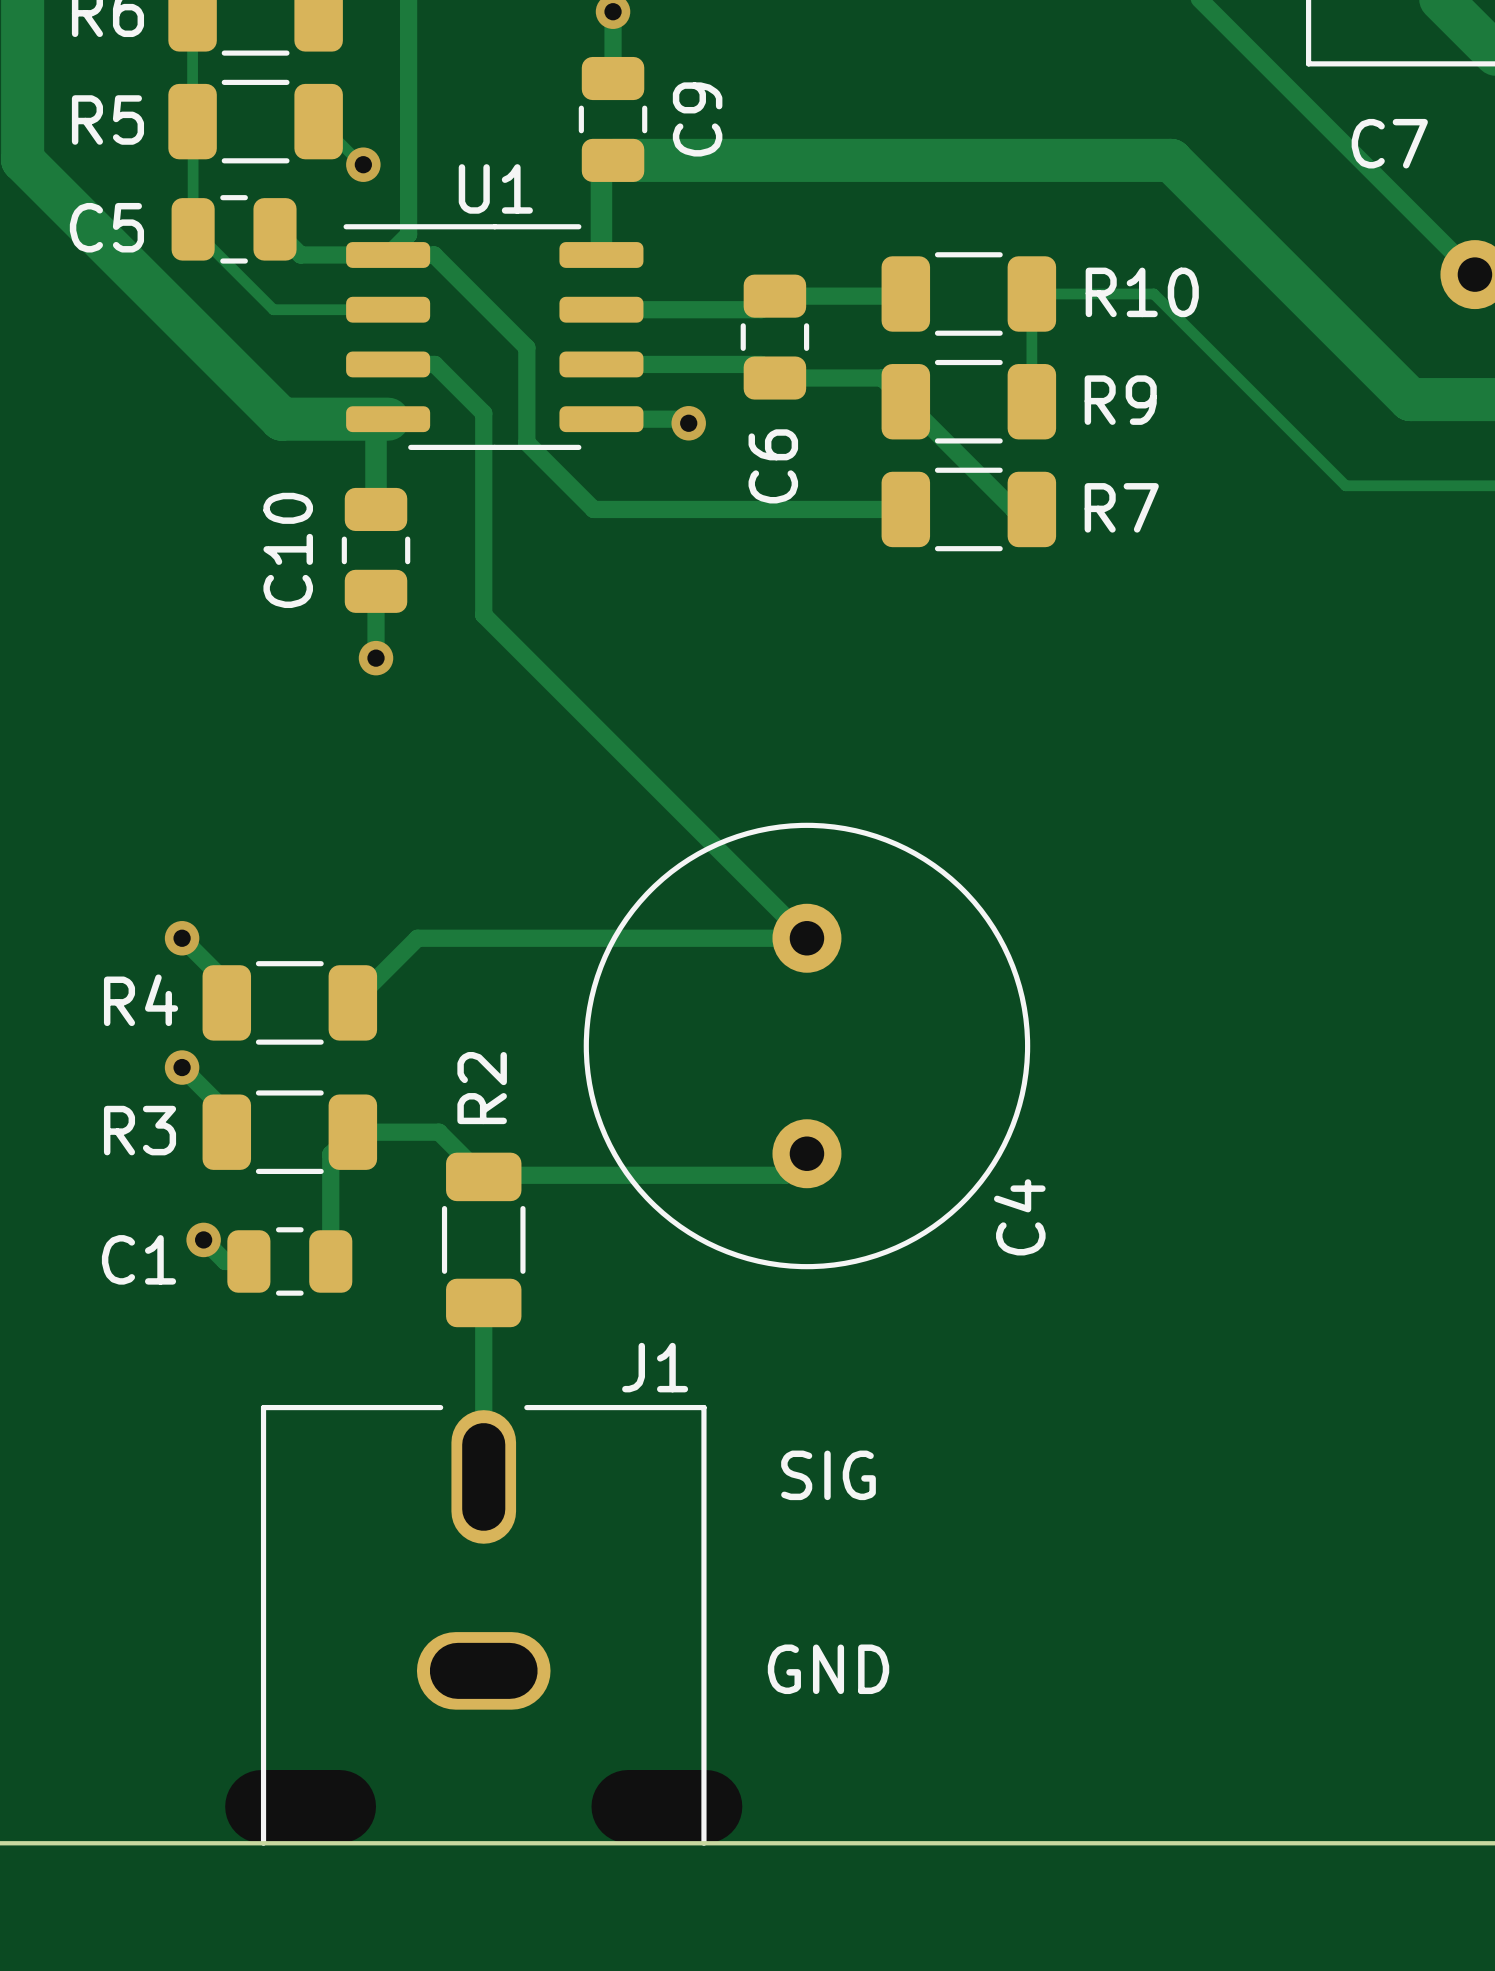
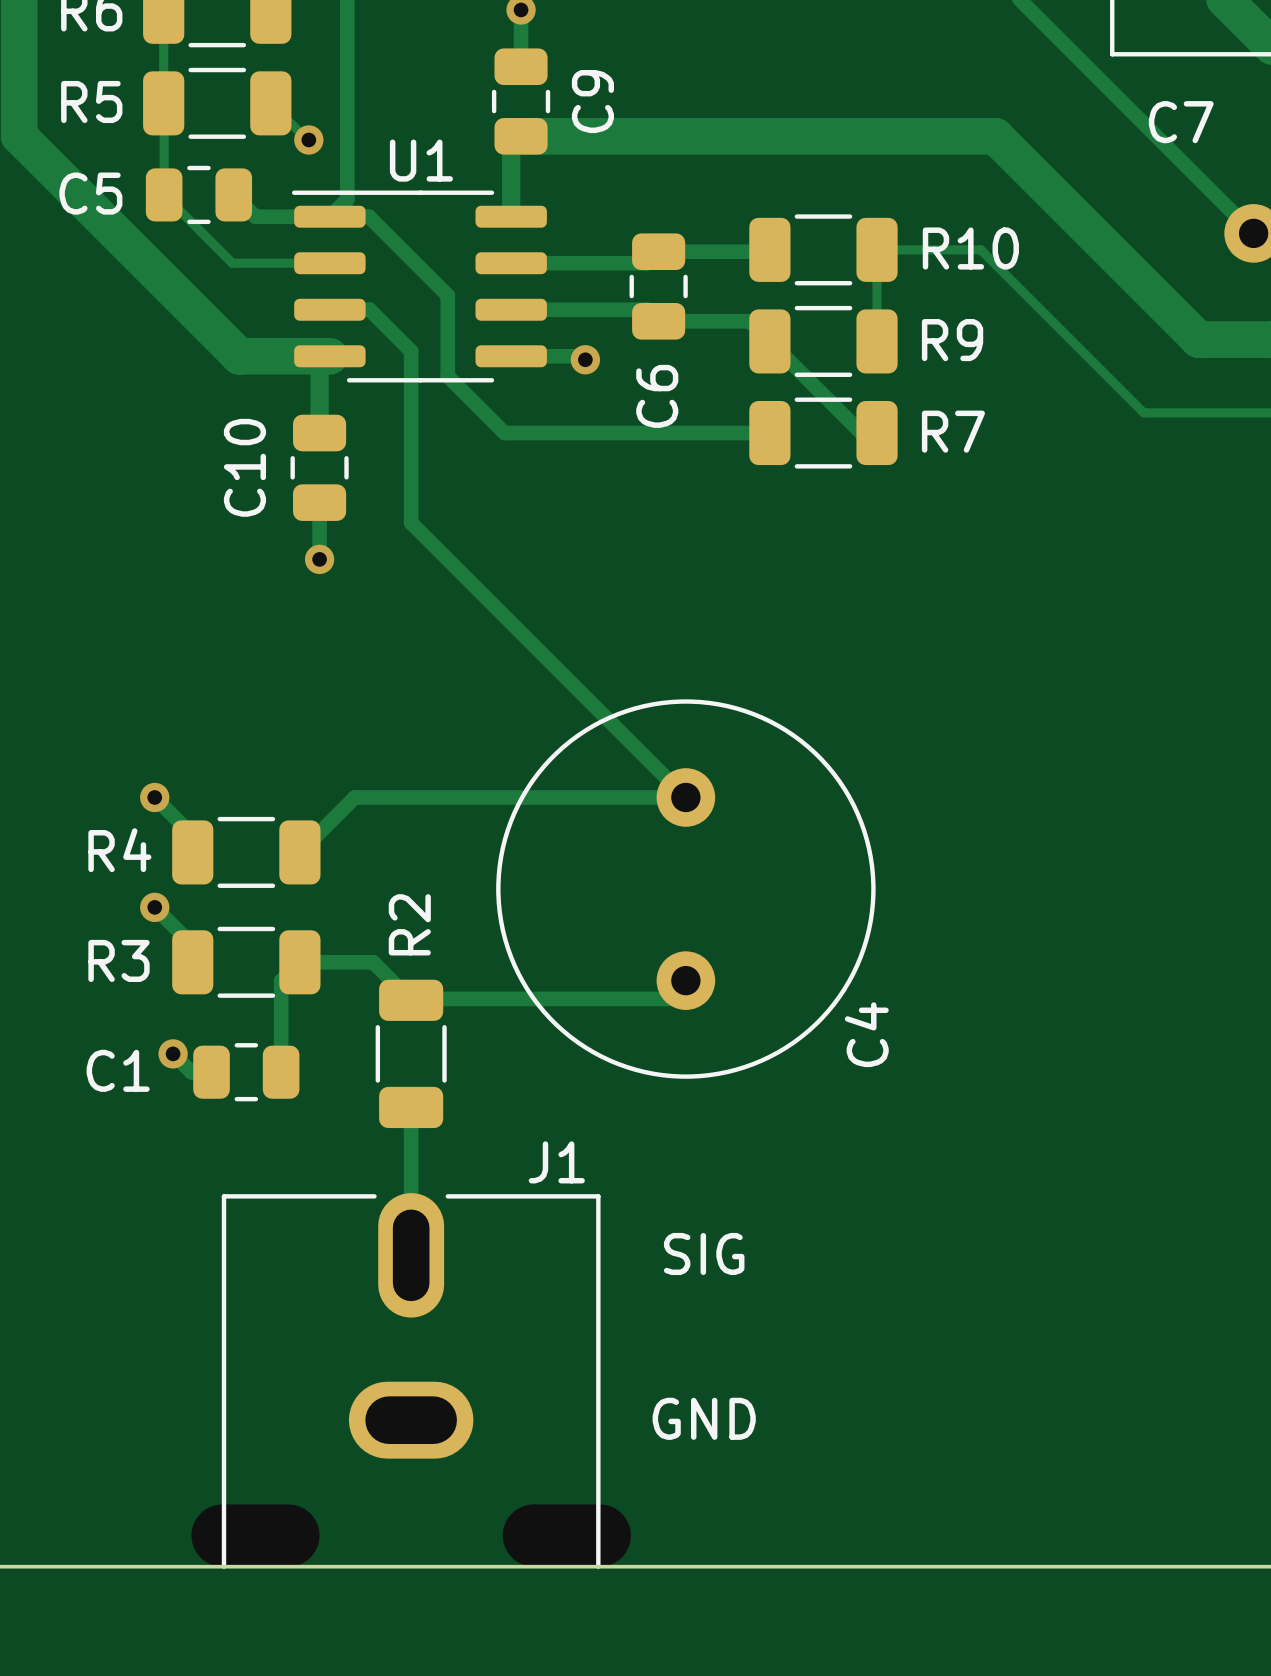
J1 footprint: [225, 1404, 743, 1846] -> [191, 1193, 631, 1569]

